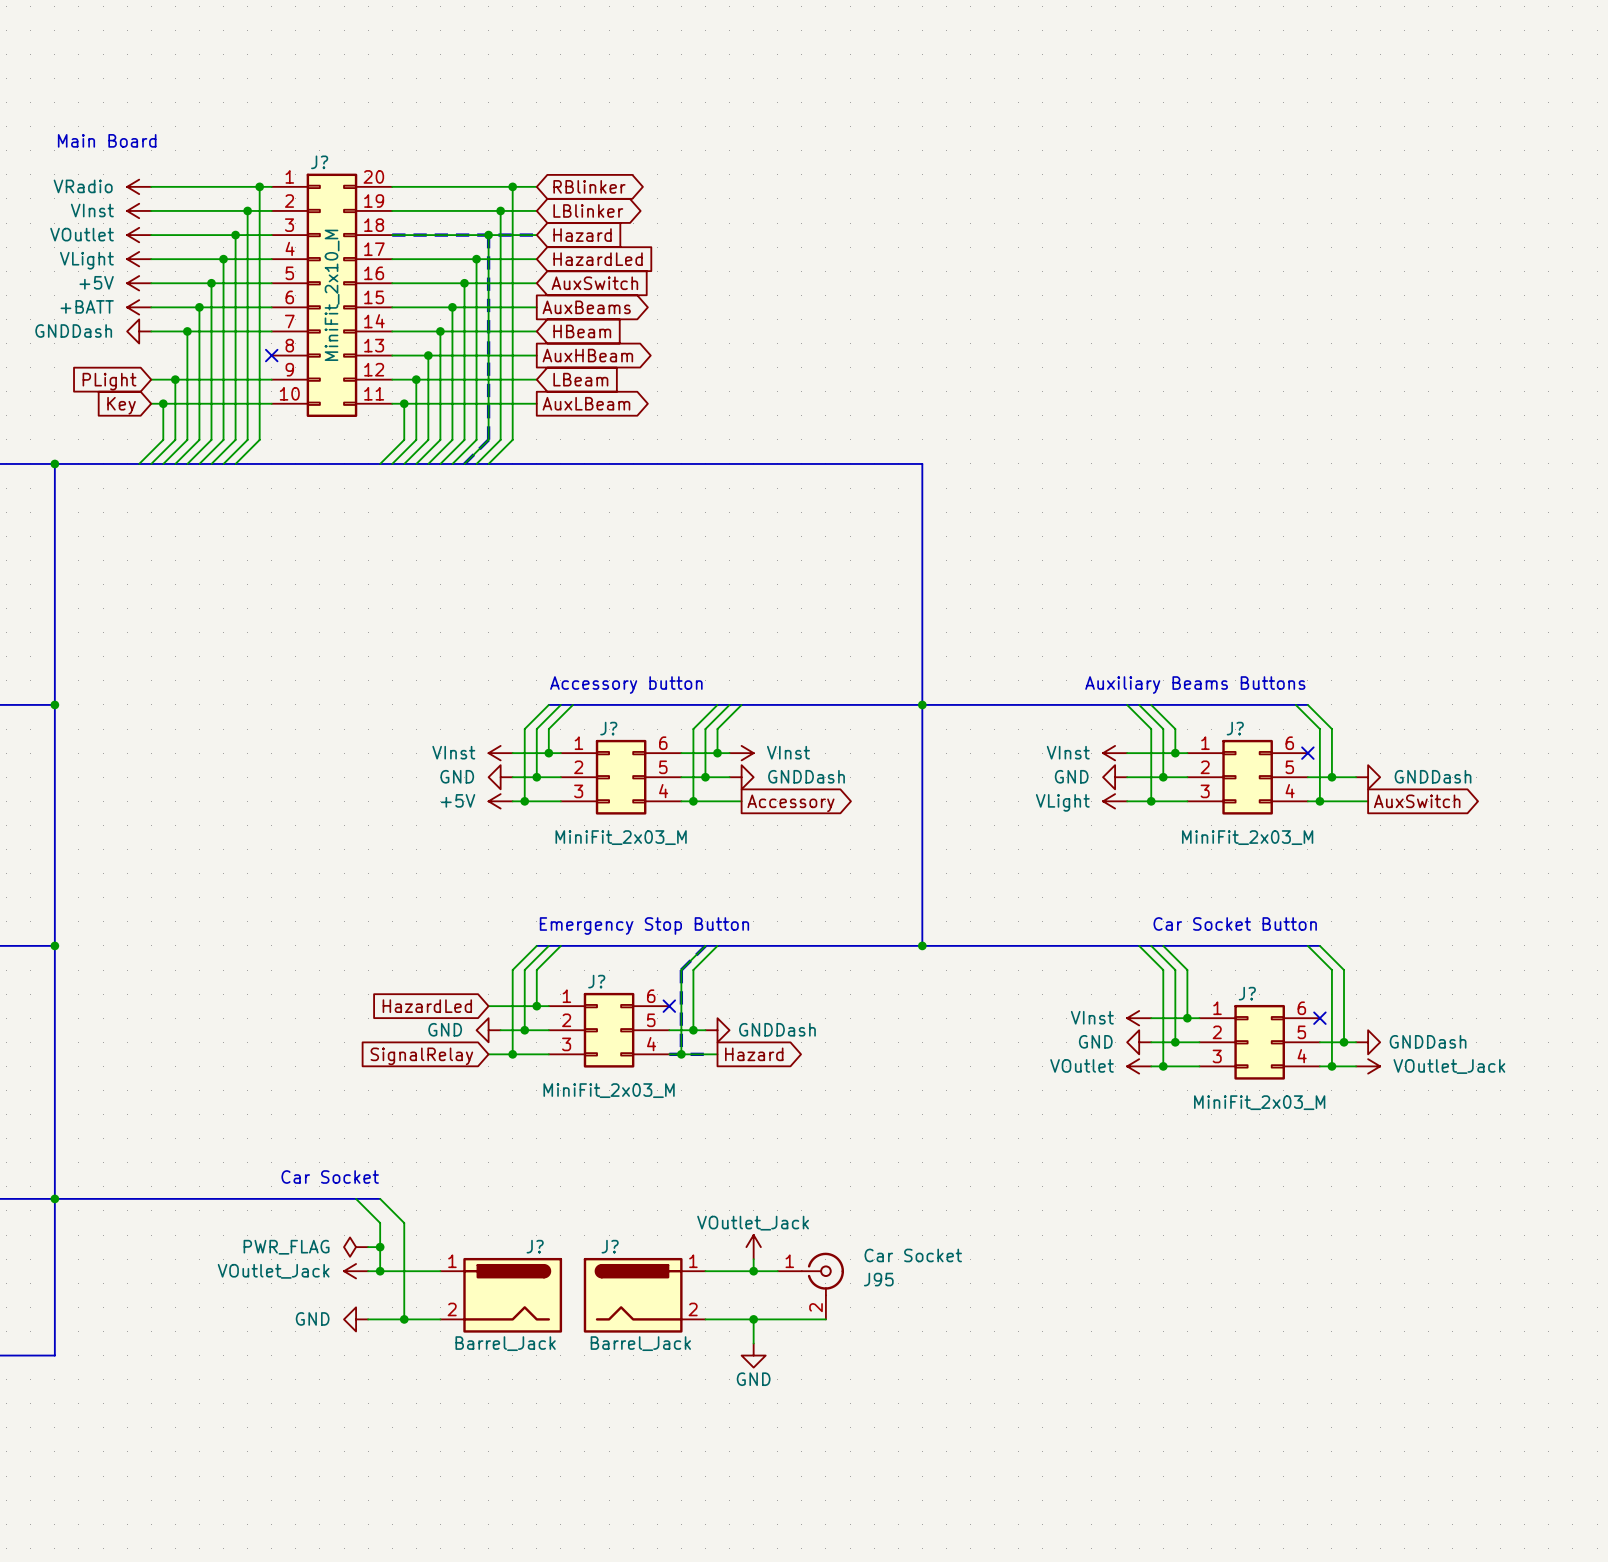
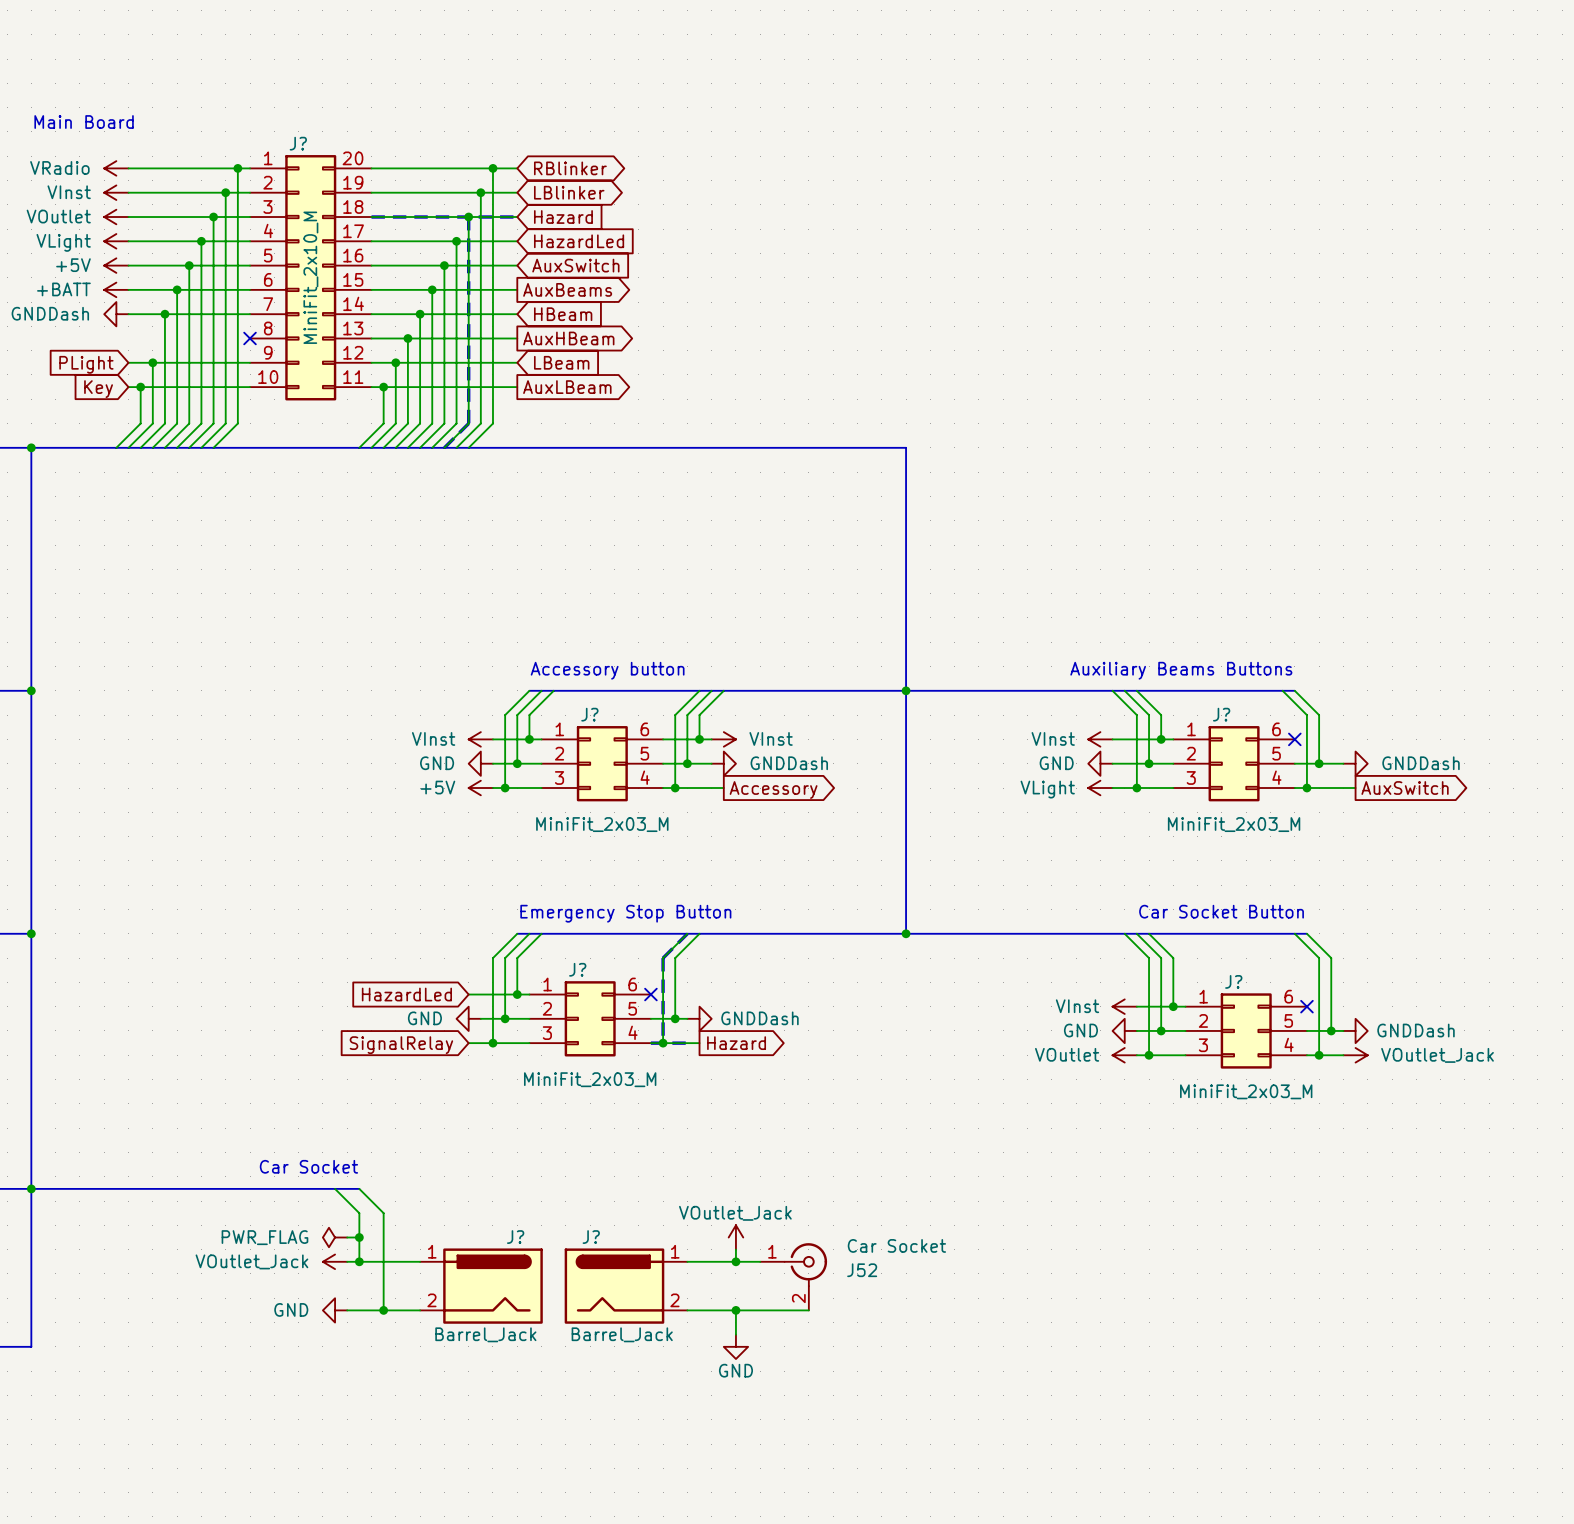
J95 name: J95 (878, 1279) -> J52 (862, 1270)

